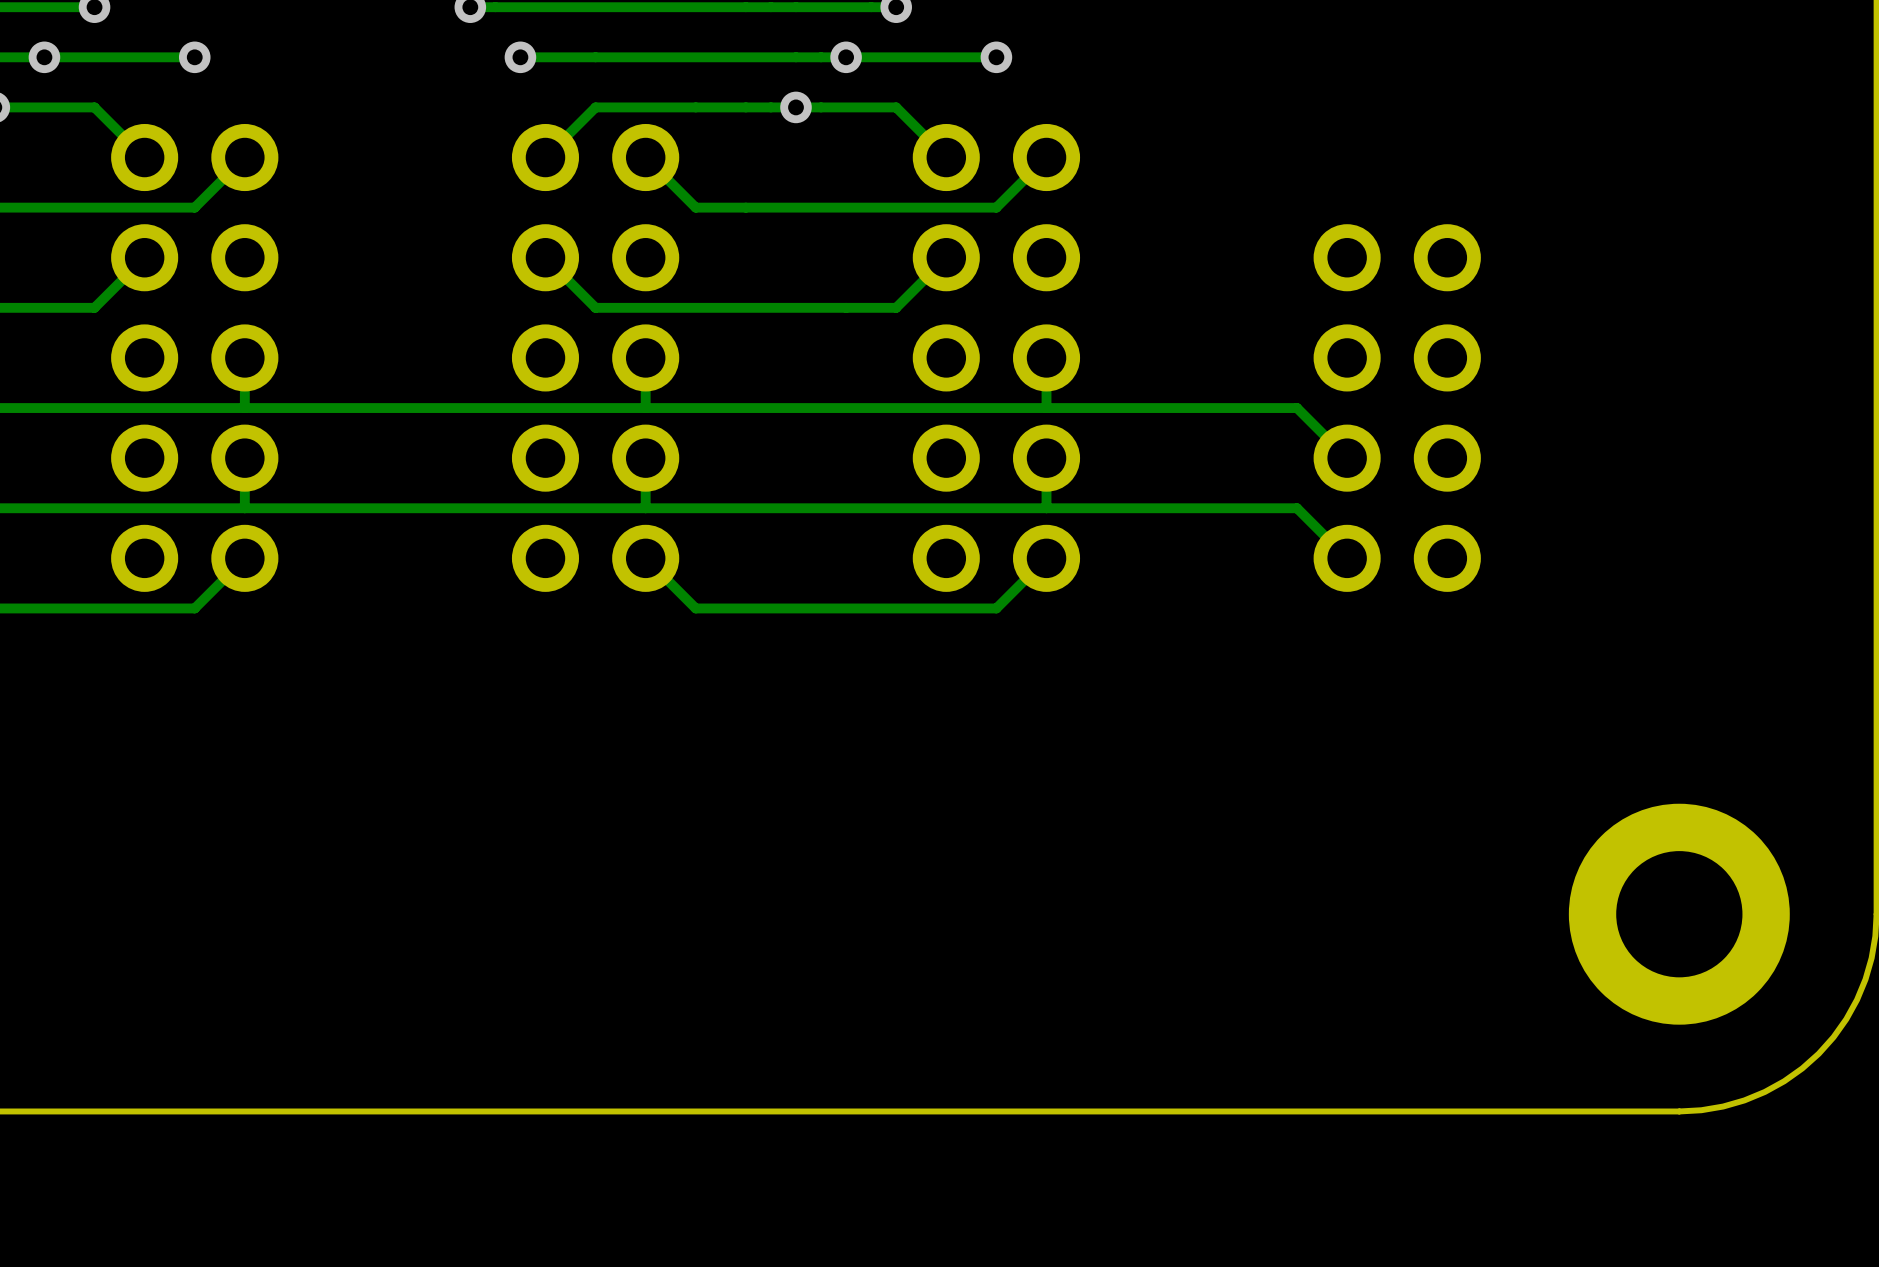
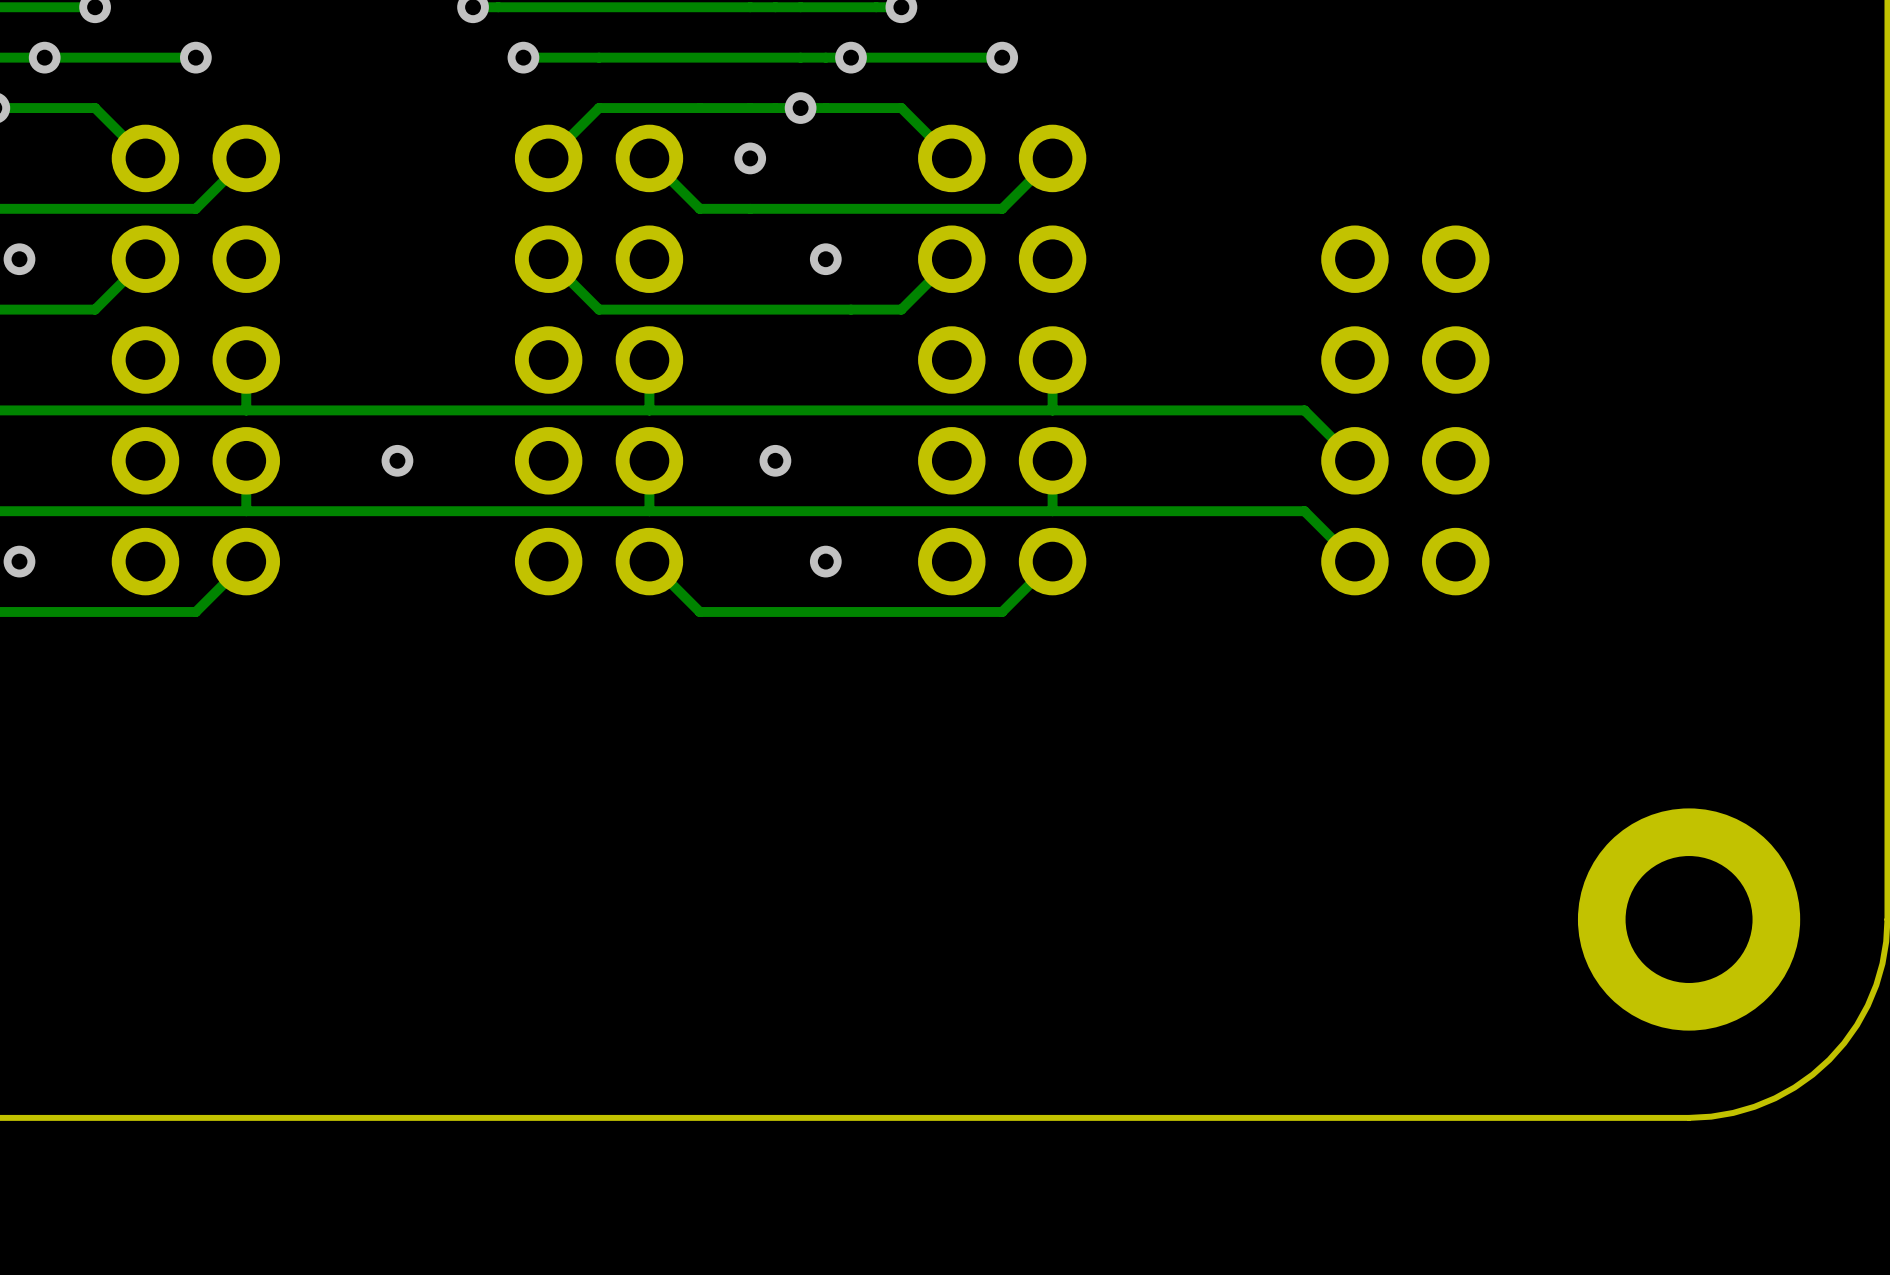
via: none -> (750, 158)
via: none -> (19, 259)
via: none -> (825, 259)
via: none -> (397, 460)
via: none -> (775, 460)
via: none -> (19, 561)
via: none -> (825, 561)

